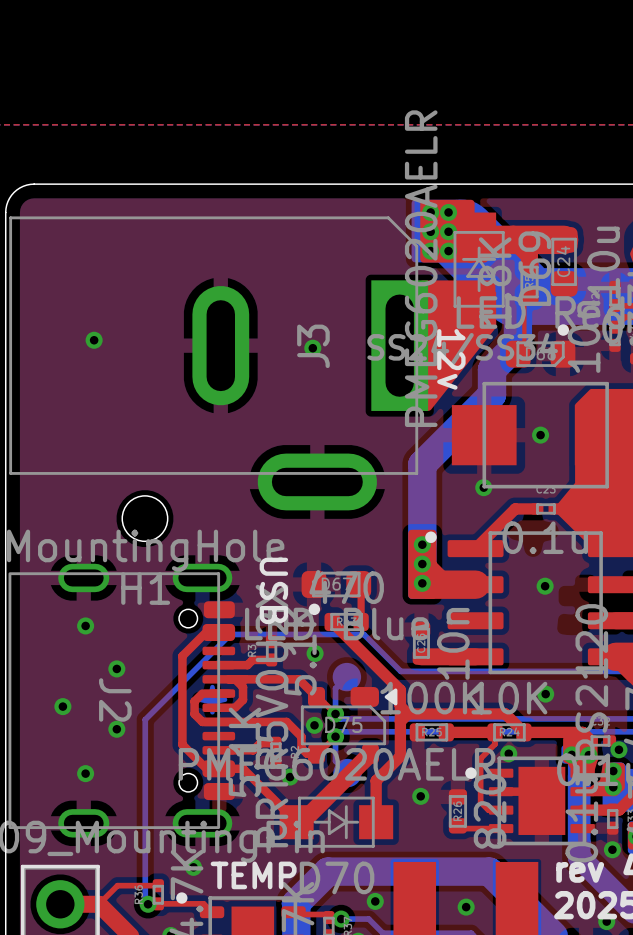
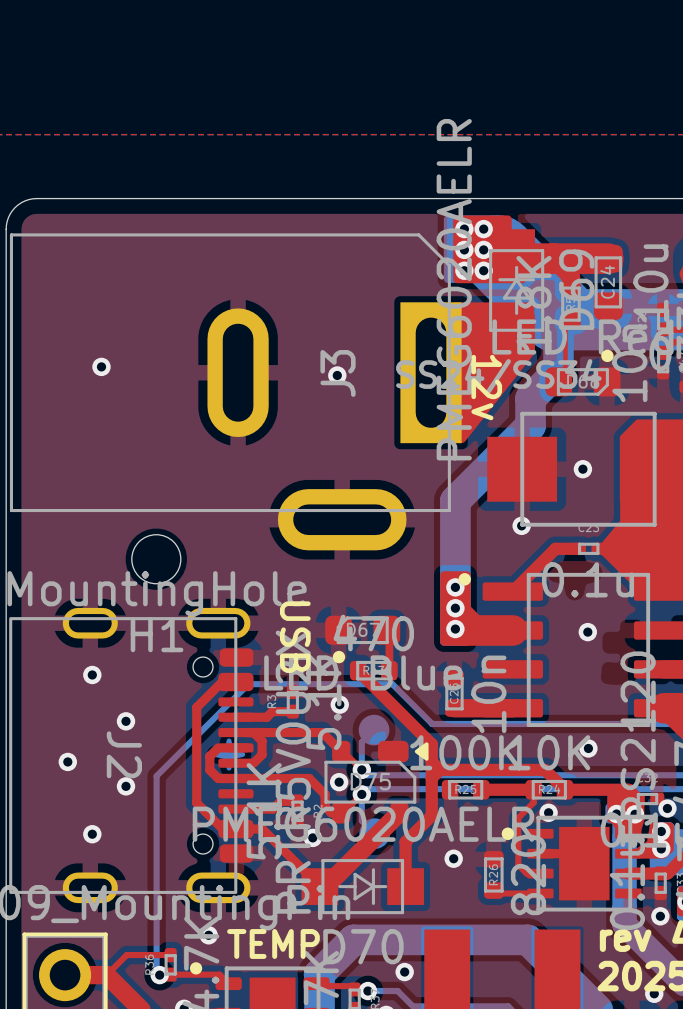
via: (466, 907) -> none

